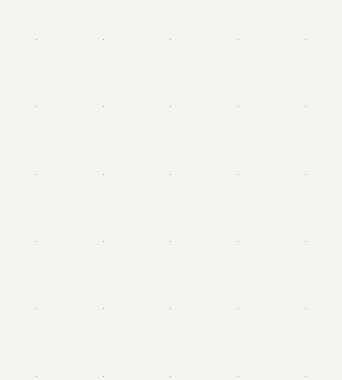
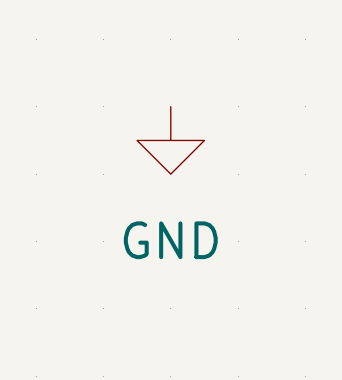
power symbol: none -> GND (170, 140)

